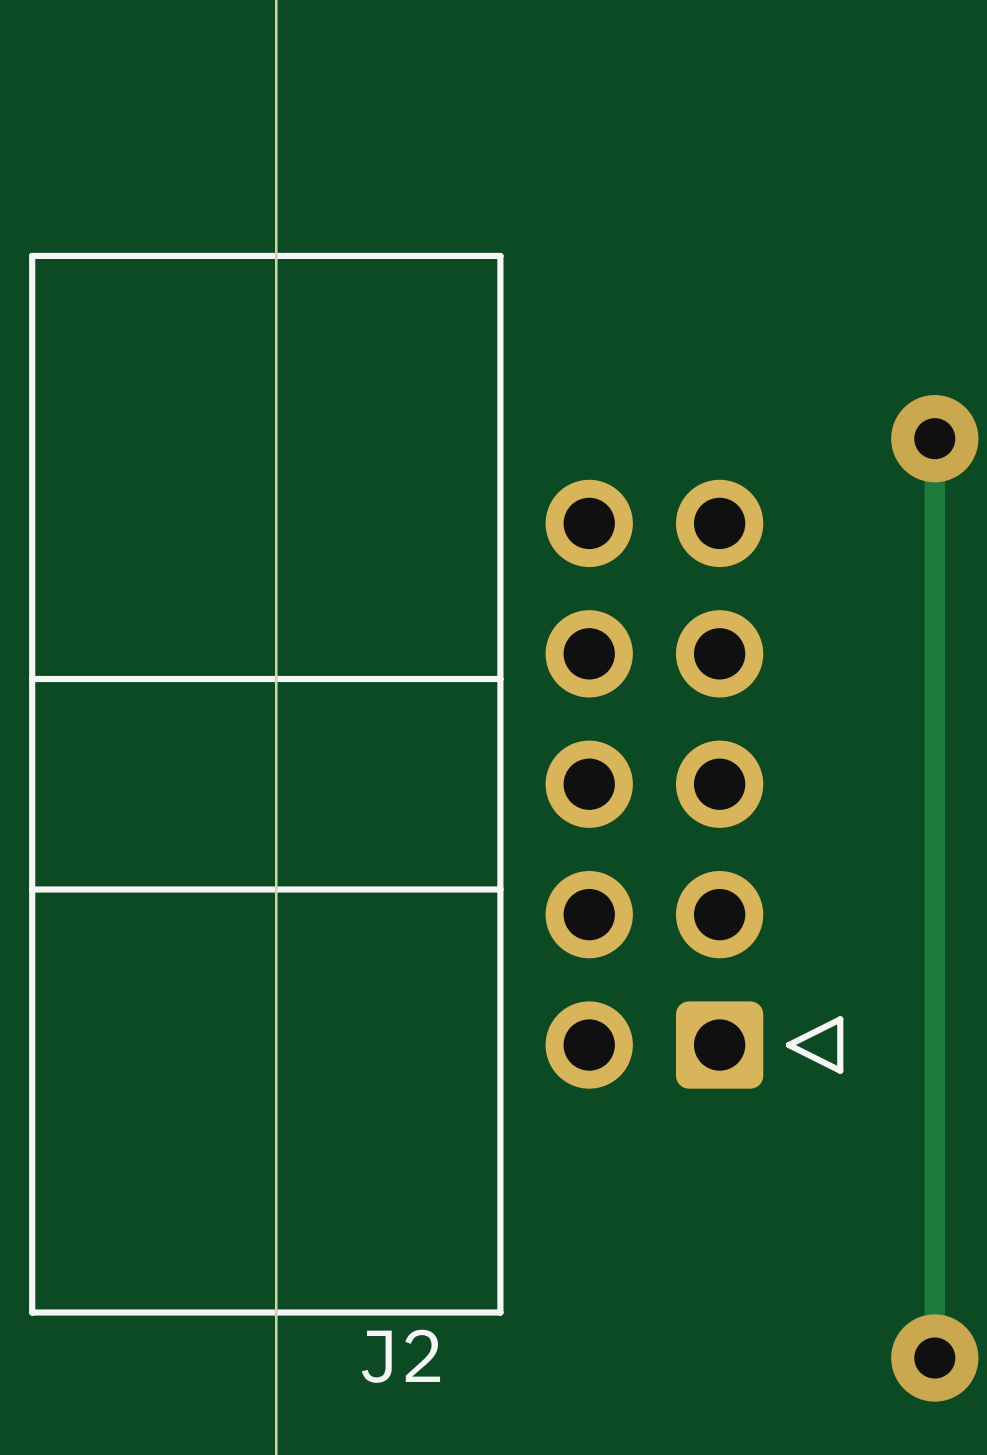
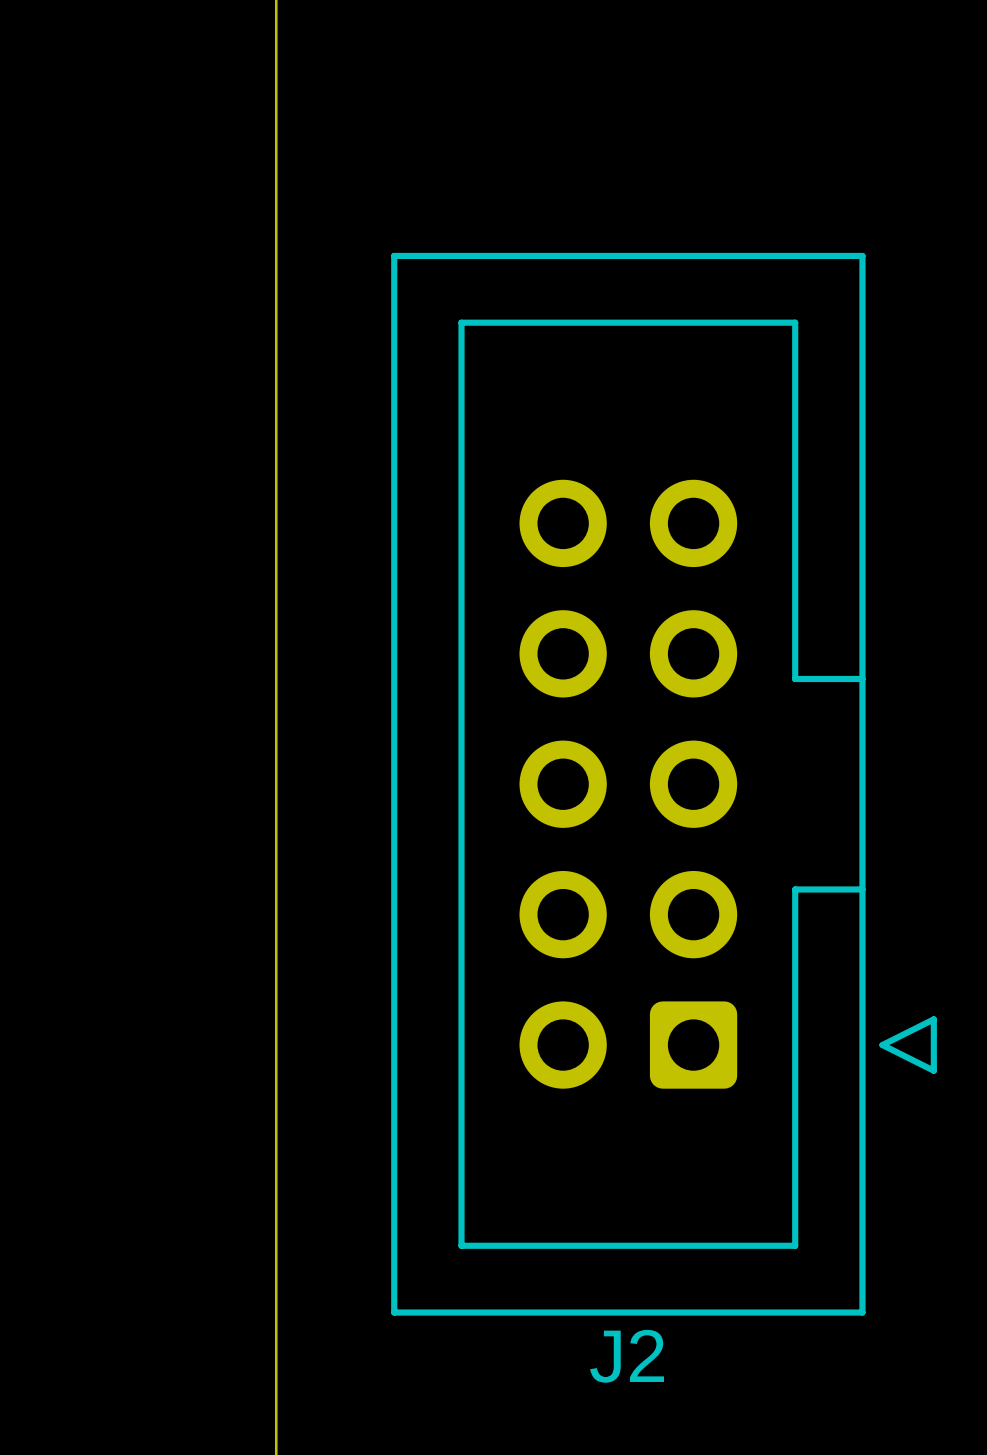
J2 footprint: [29, 252, 844, 1316] -> [391, 252, 937, 1316]
track: (934, 438) (934, 1358) -> none
via: (934, 438) -> none
via: (934, 1358) -> none

